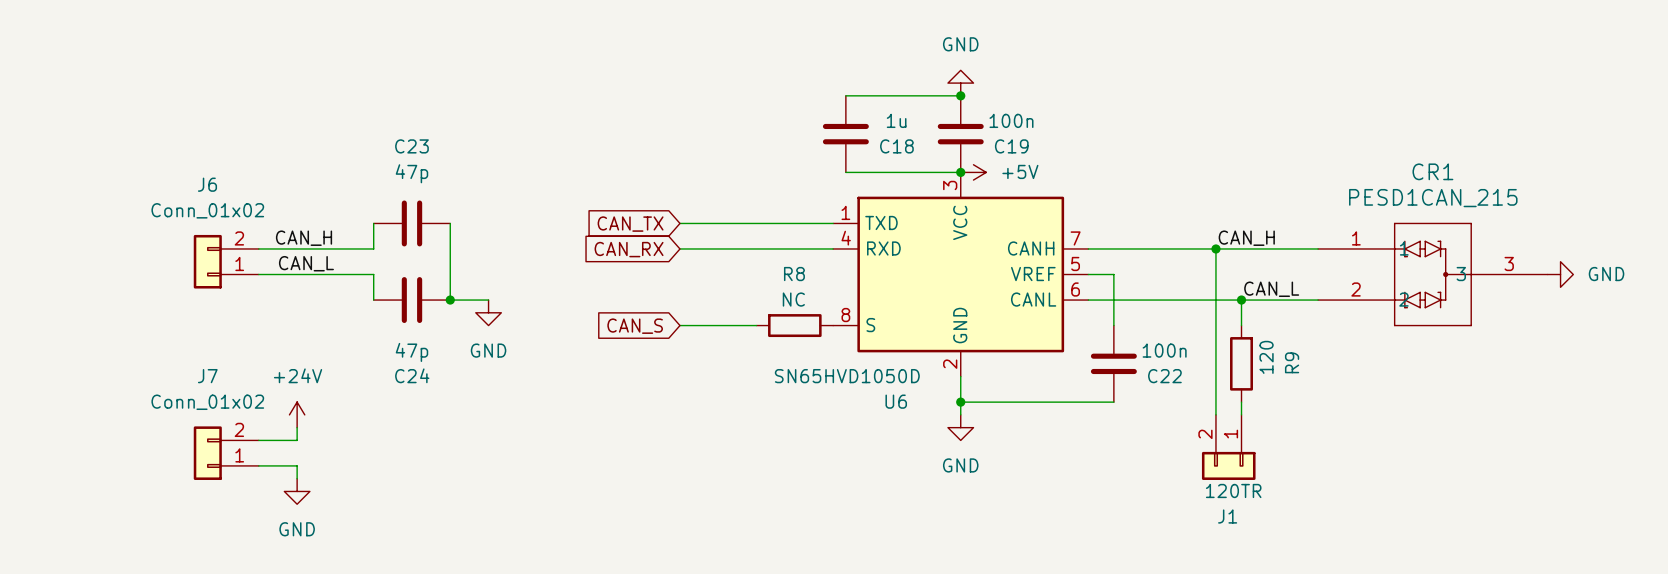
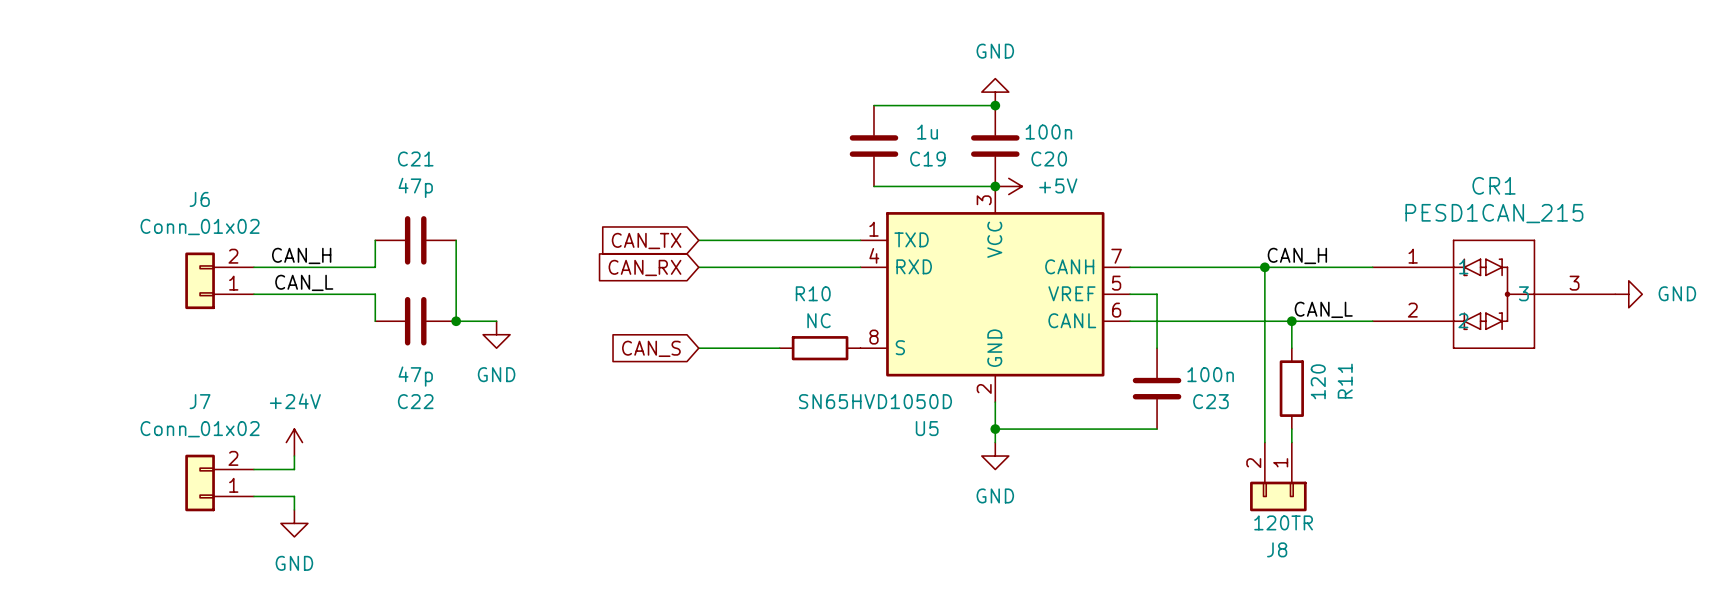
C23 name: C23 (411, 146) -> C21 (415, 158)
C18 name: C18 (896, 146) -> C19 (927, 158)
C19 name: C19 (1011, 146) -> C20 (1049, 158)
R8 name: R8 (794, 274) -> R10 (813, 293)
R9 name: R9 (1292, 362) -> R11 (1345, 381)
C24 name: C24 (412, 375) -> C22 (415, 401)
C22 name: C22 (1164, 376) -> C23 (1210, 401)
U6 name: U6 (896, 401) -> U5 (927, 428)
J1 name: J1 (1227, 516) -> J8 (1277, 549)

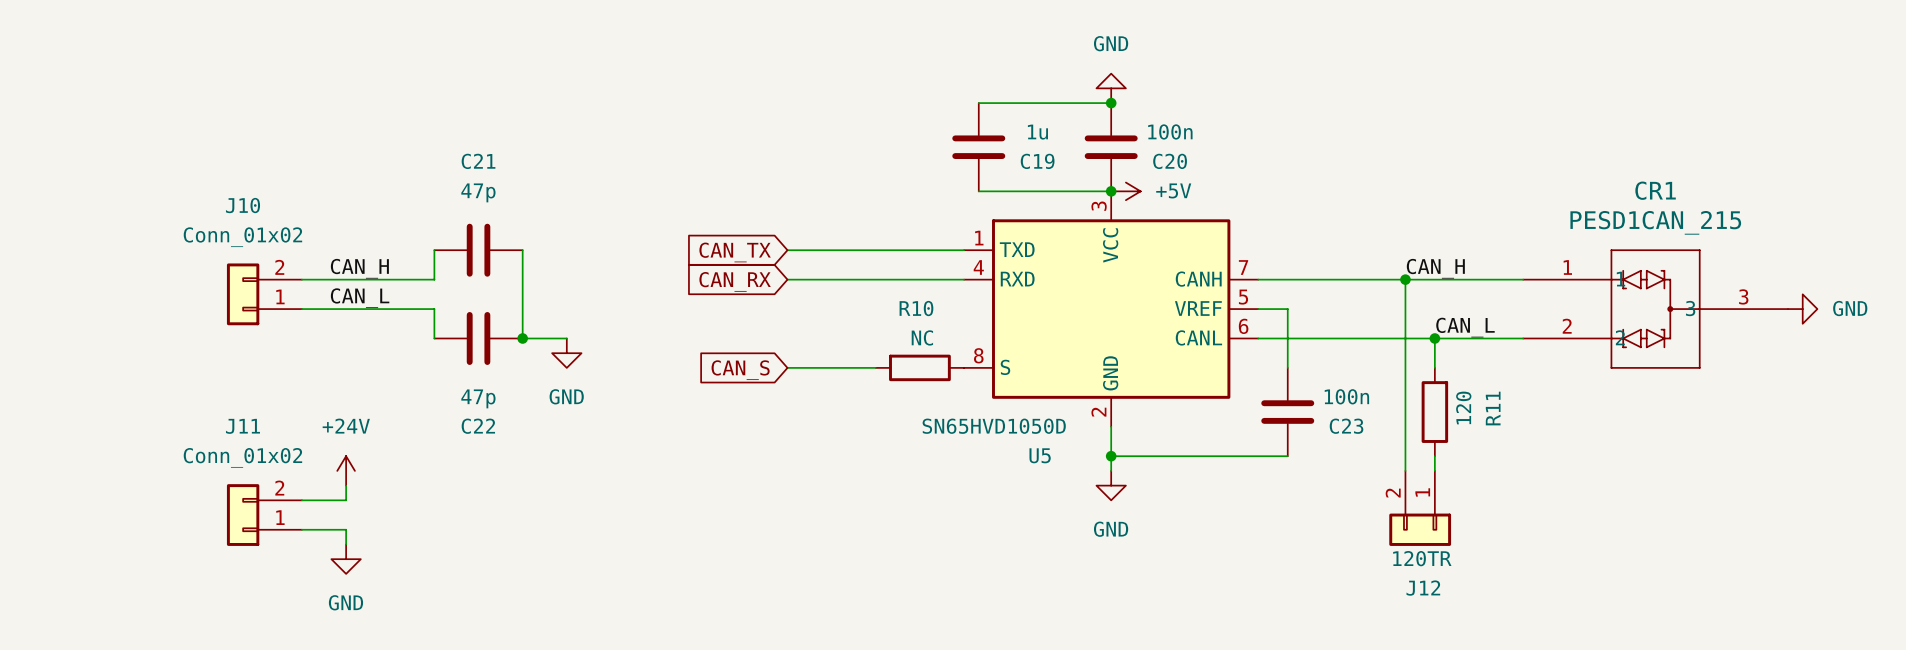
J6 name: J6 (199, 199) -> J10 (243, 205)
J7 name: J7 (200, 401) -> J11 (242, 426)
J8 name: J8 (1277, 549) -> J12 (1423, 588)

